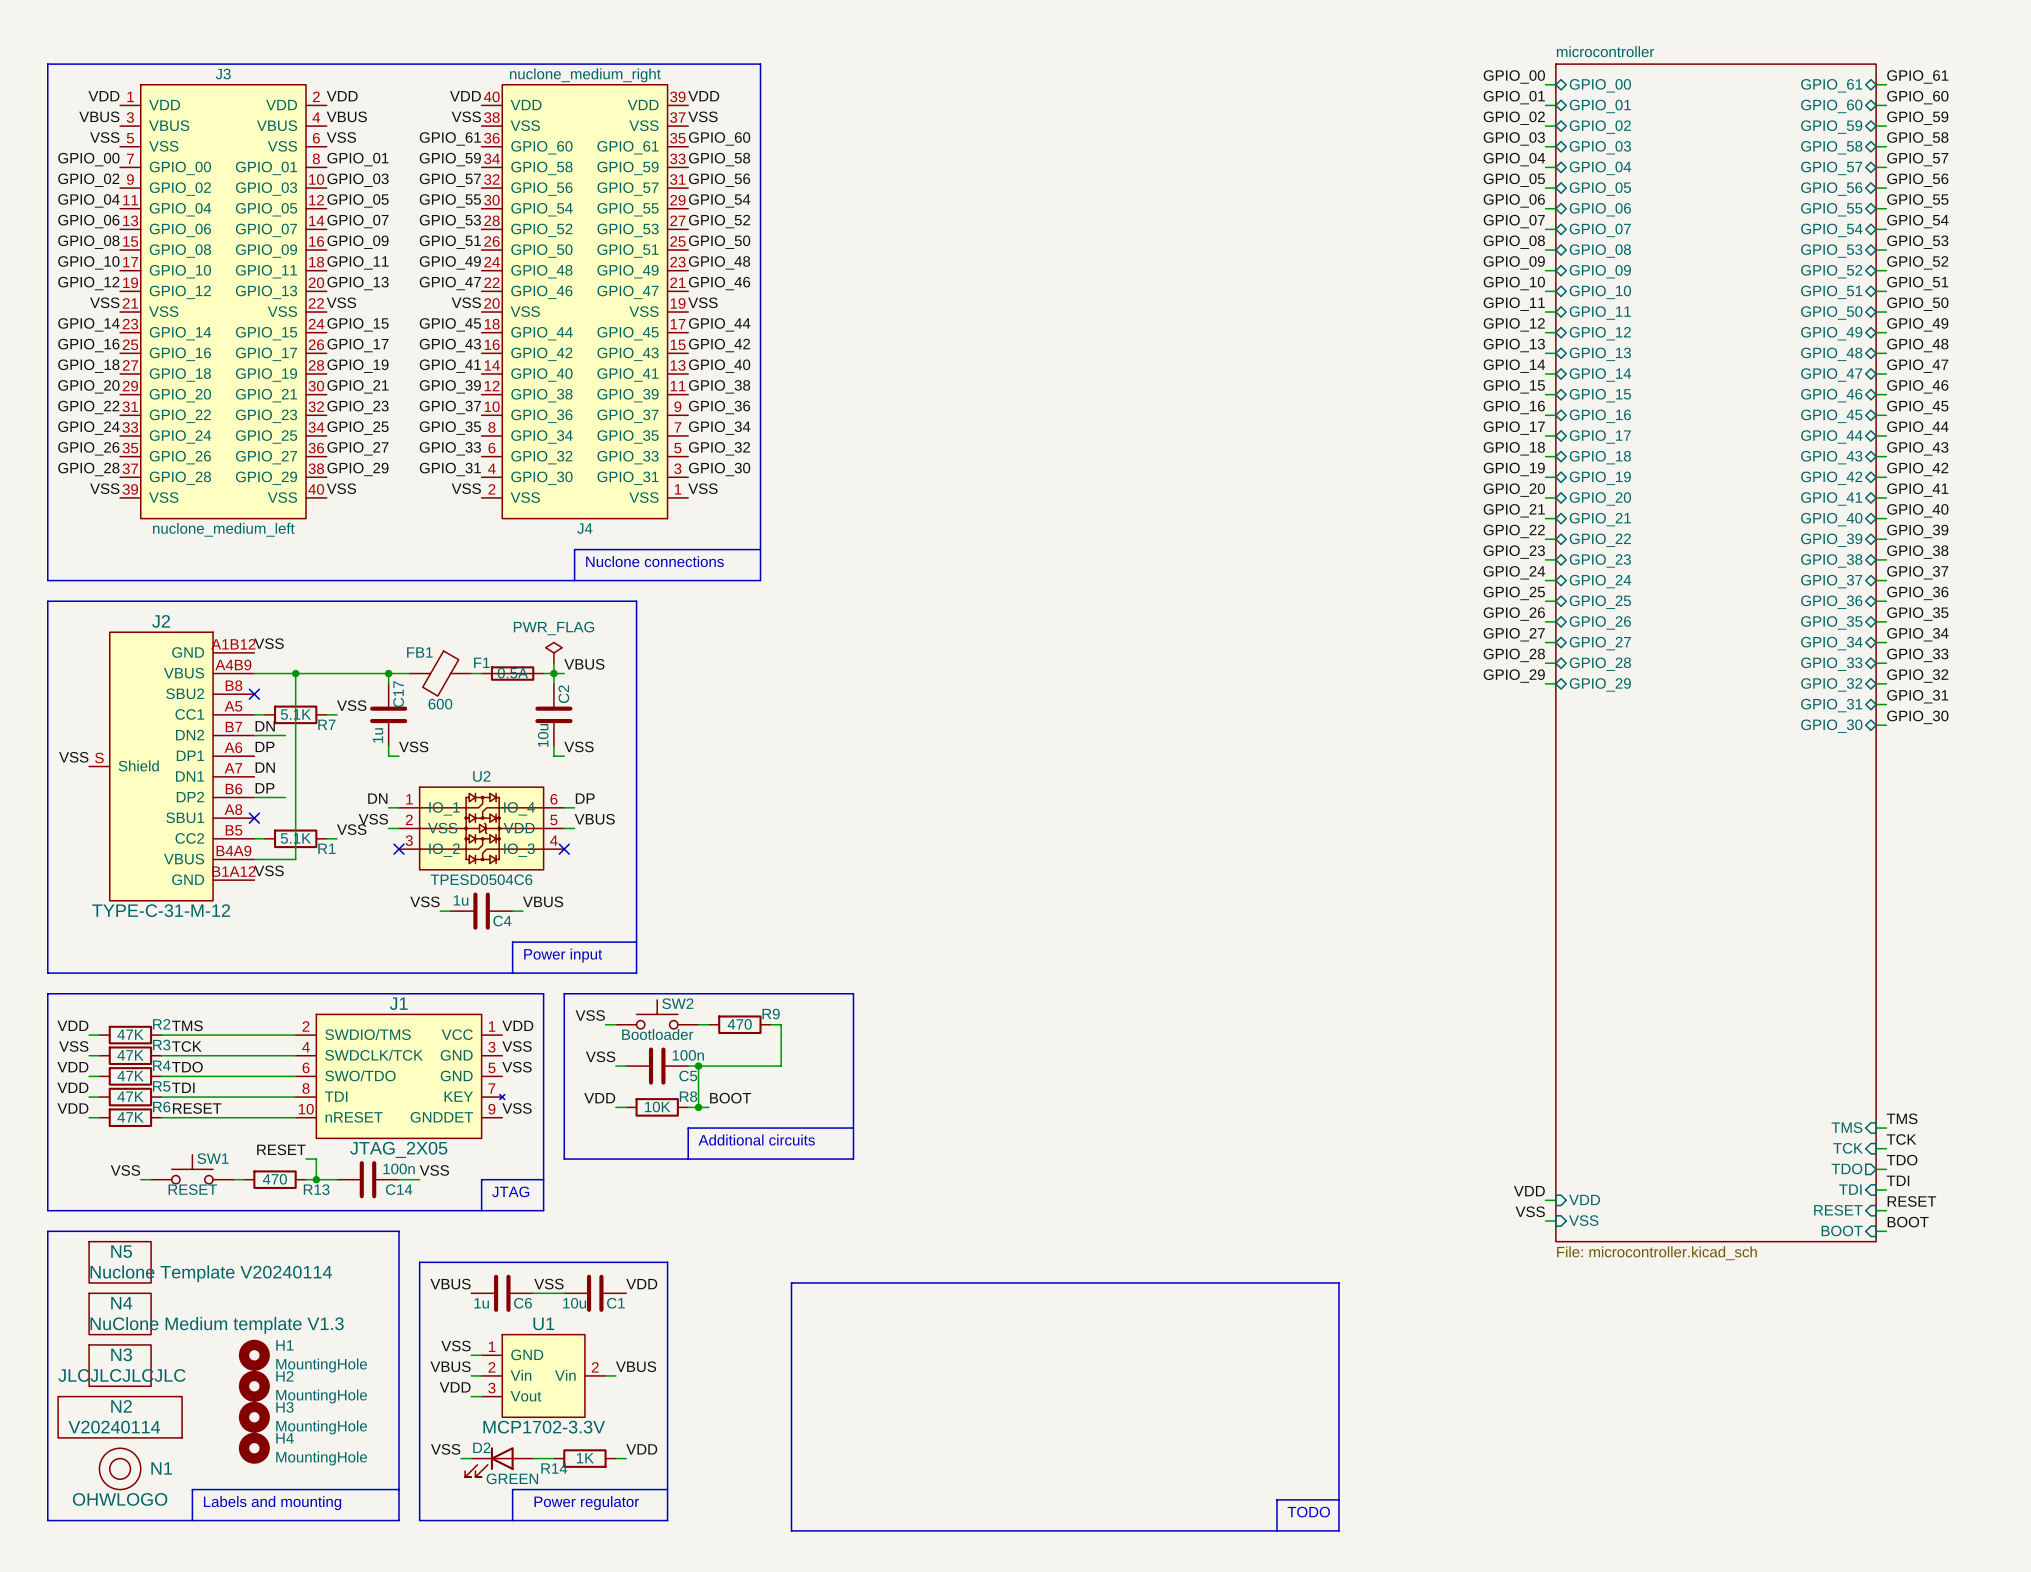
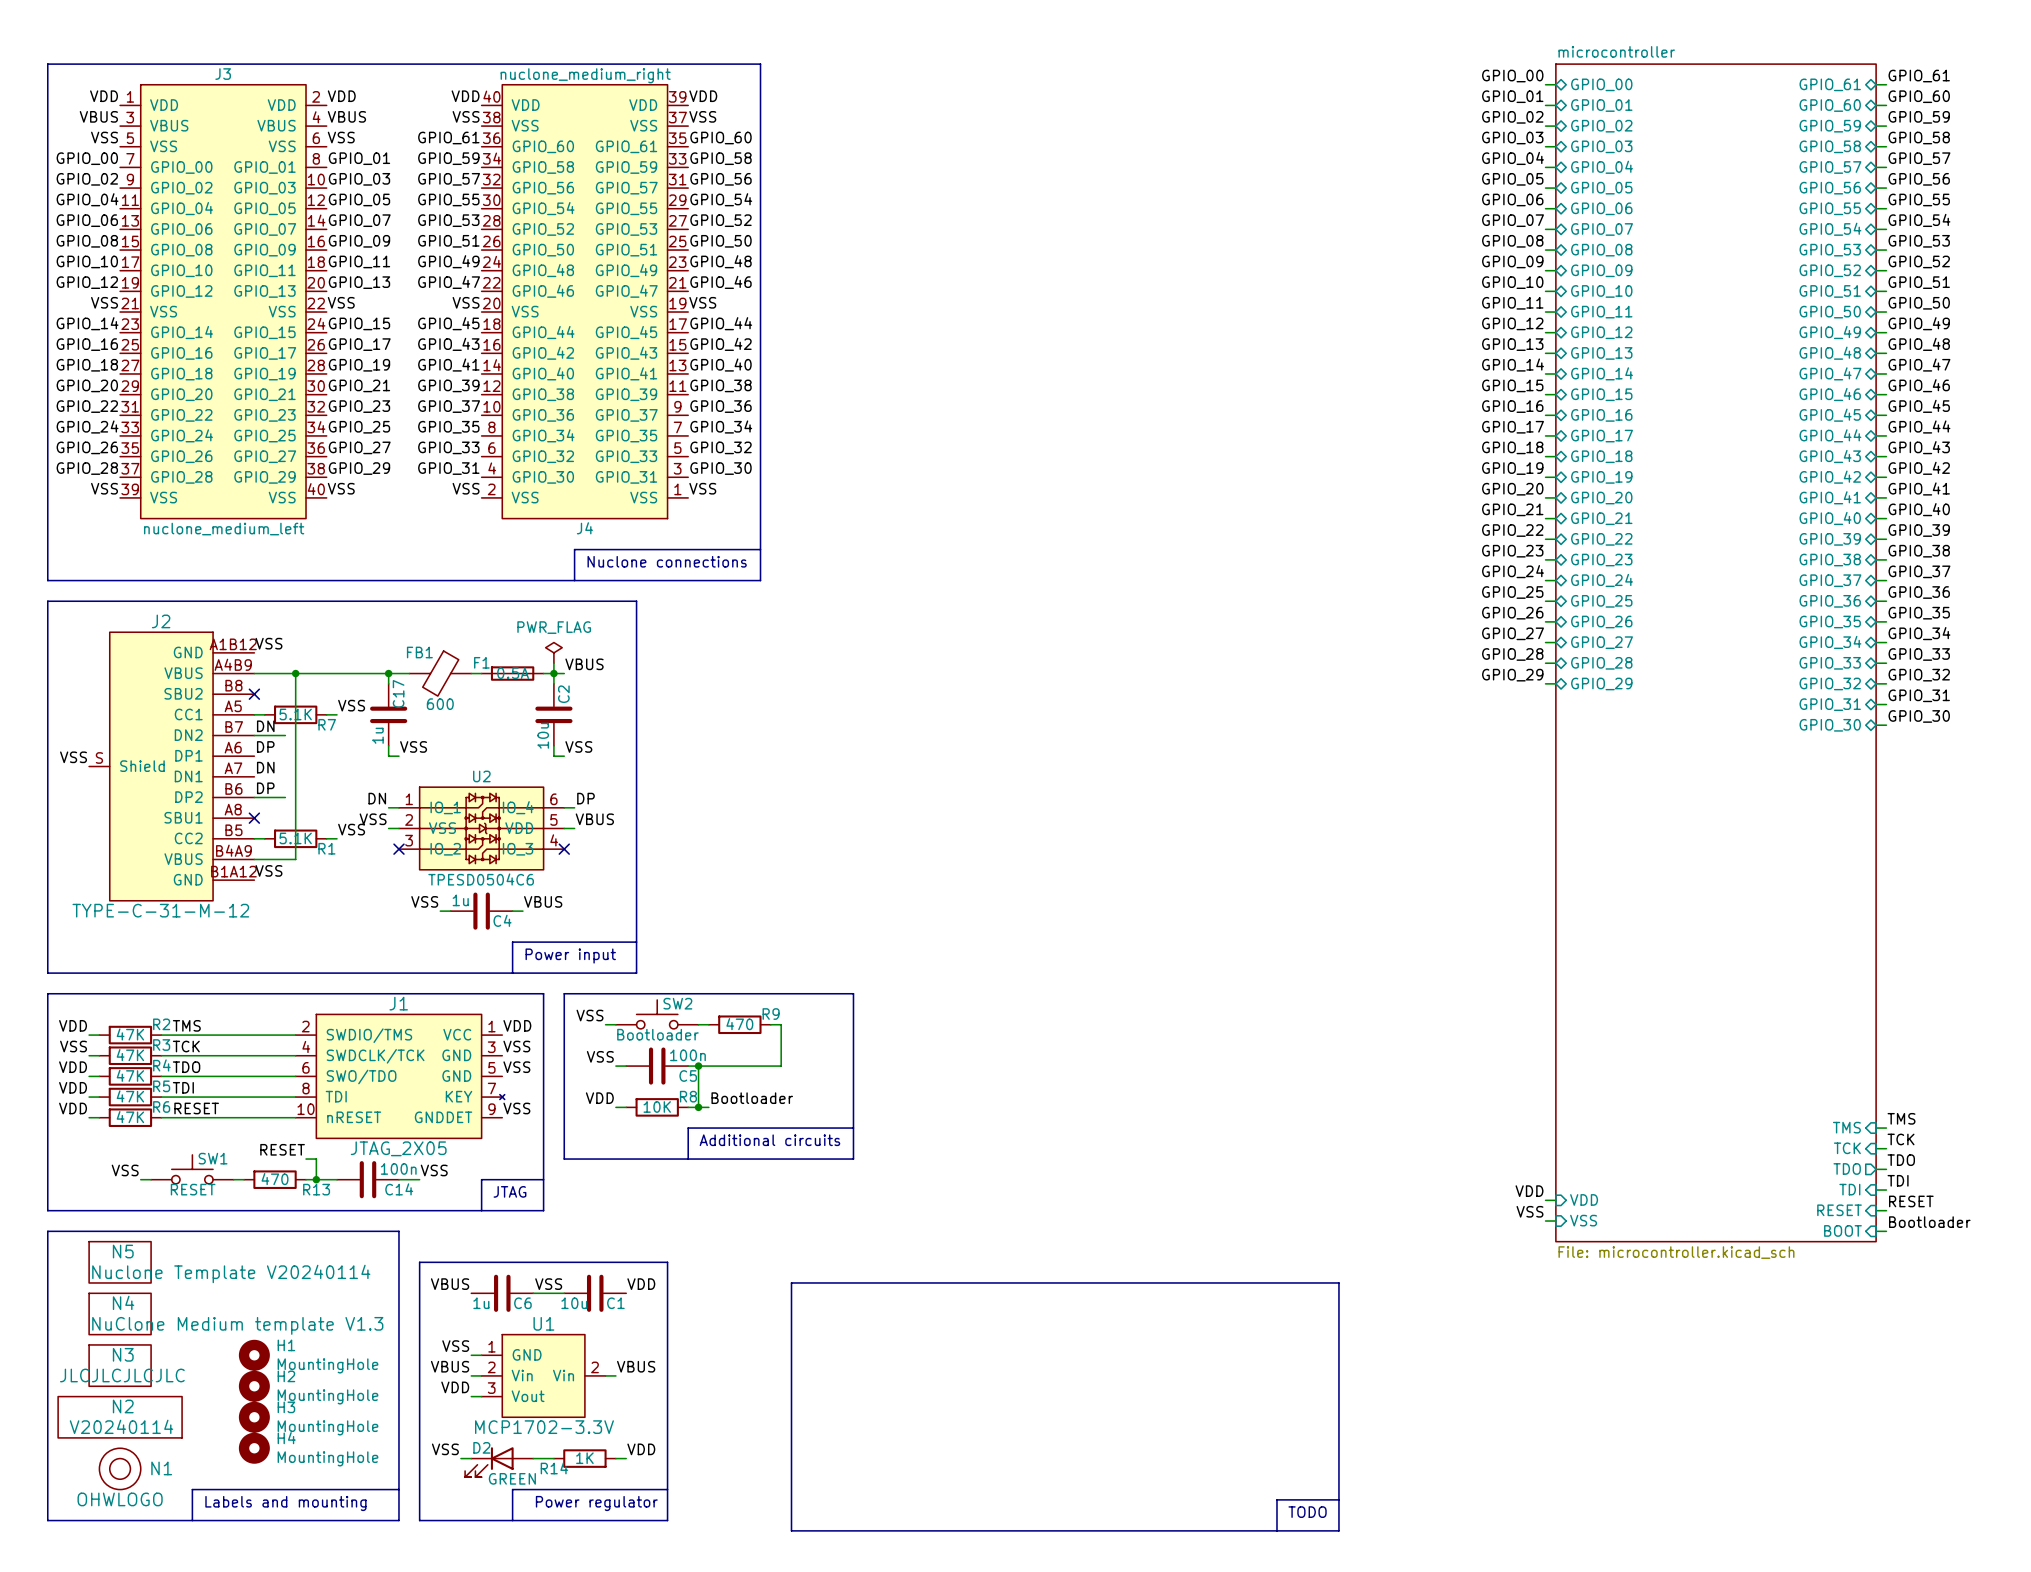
label: BOOT (730, 1098) -> Bootloader (752, 1098)
label: BOOT (1908, 1222) -> Bootloader (1929, 1222)

